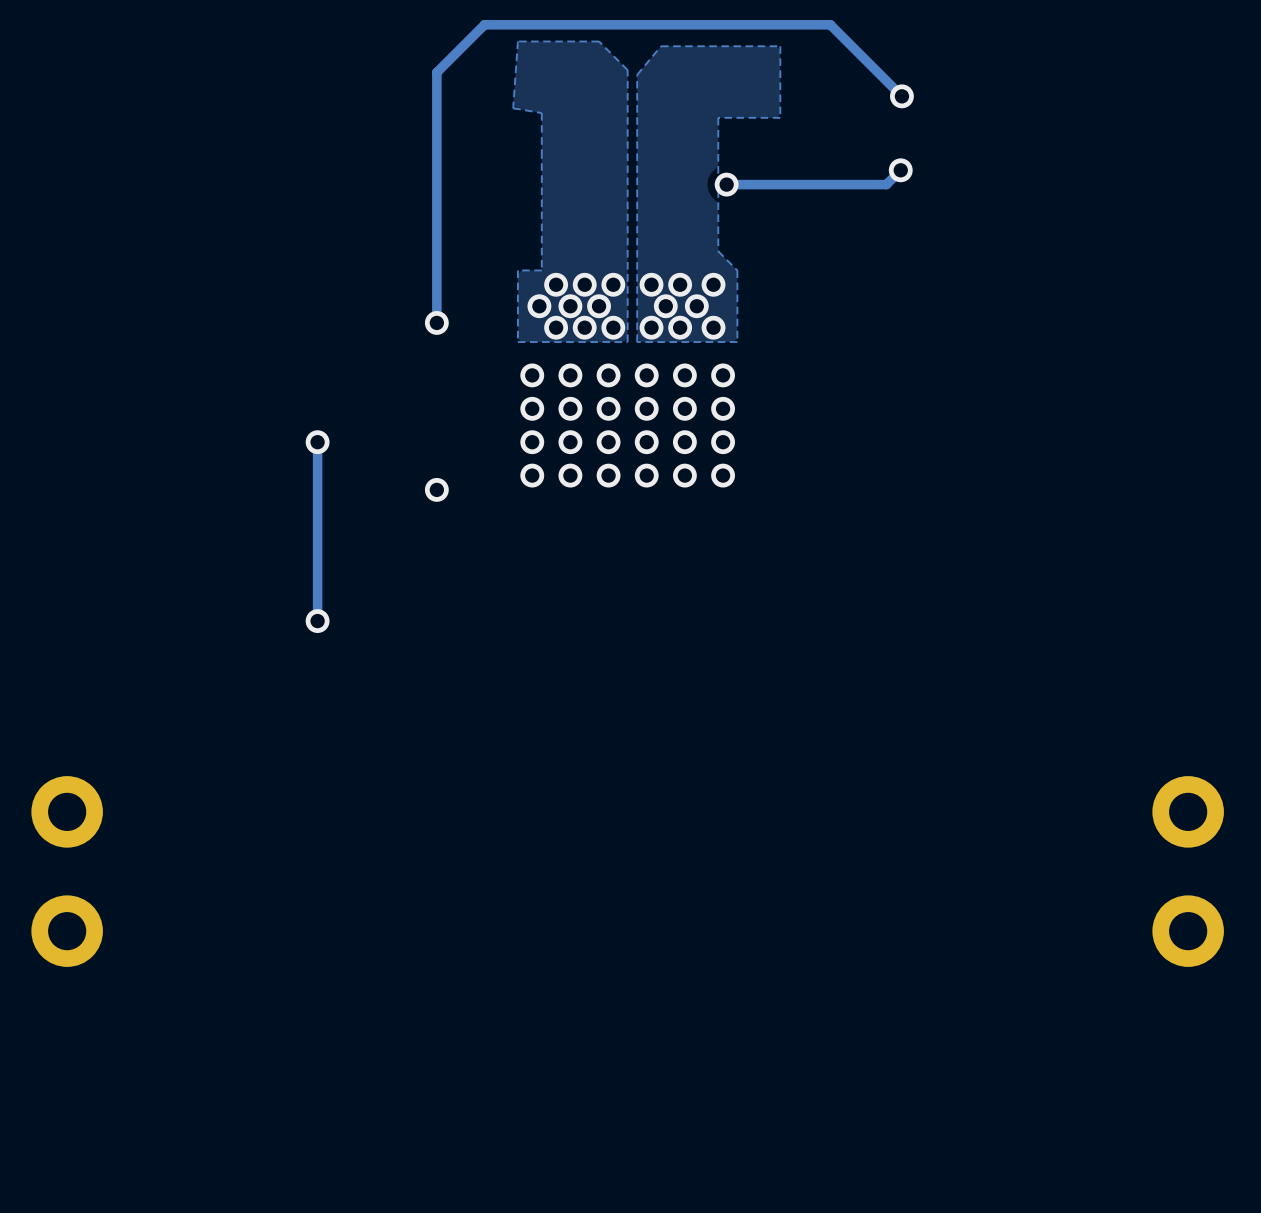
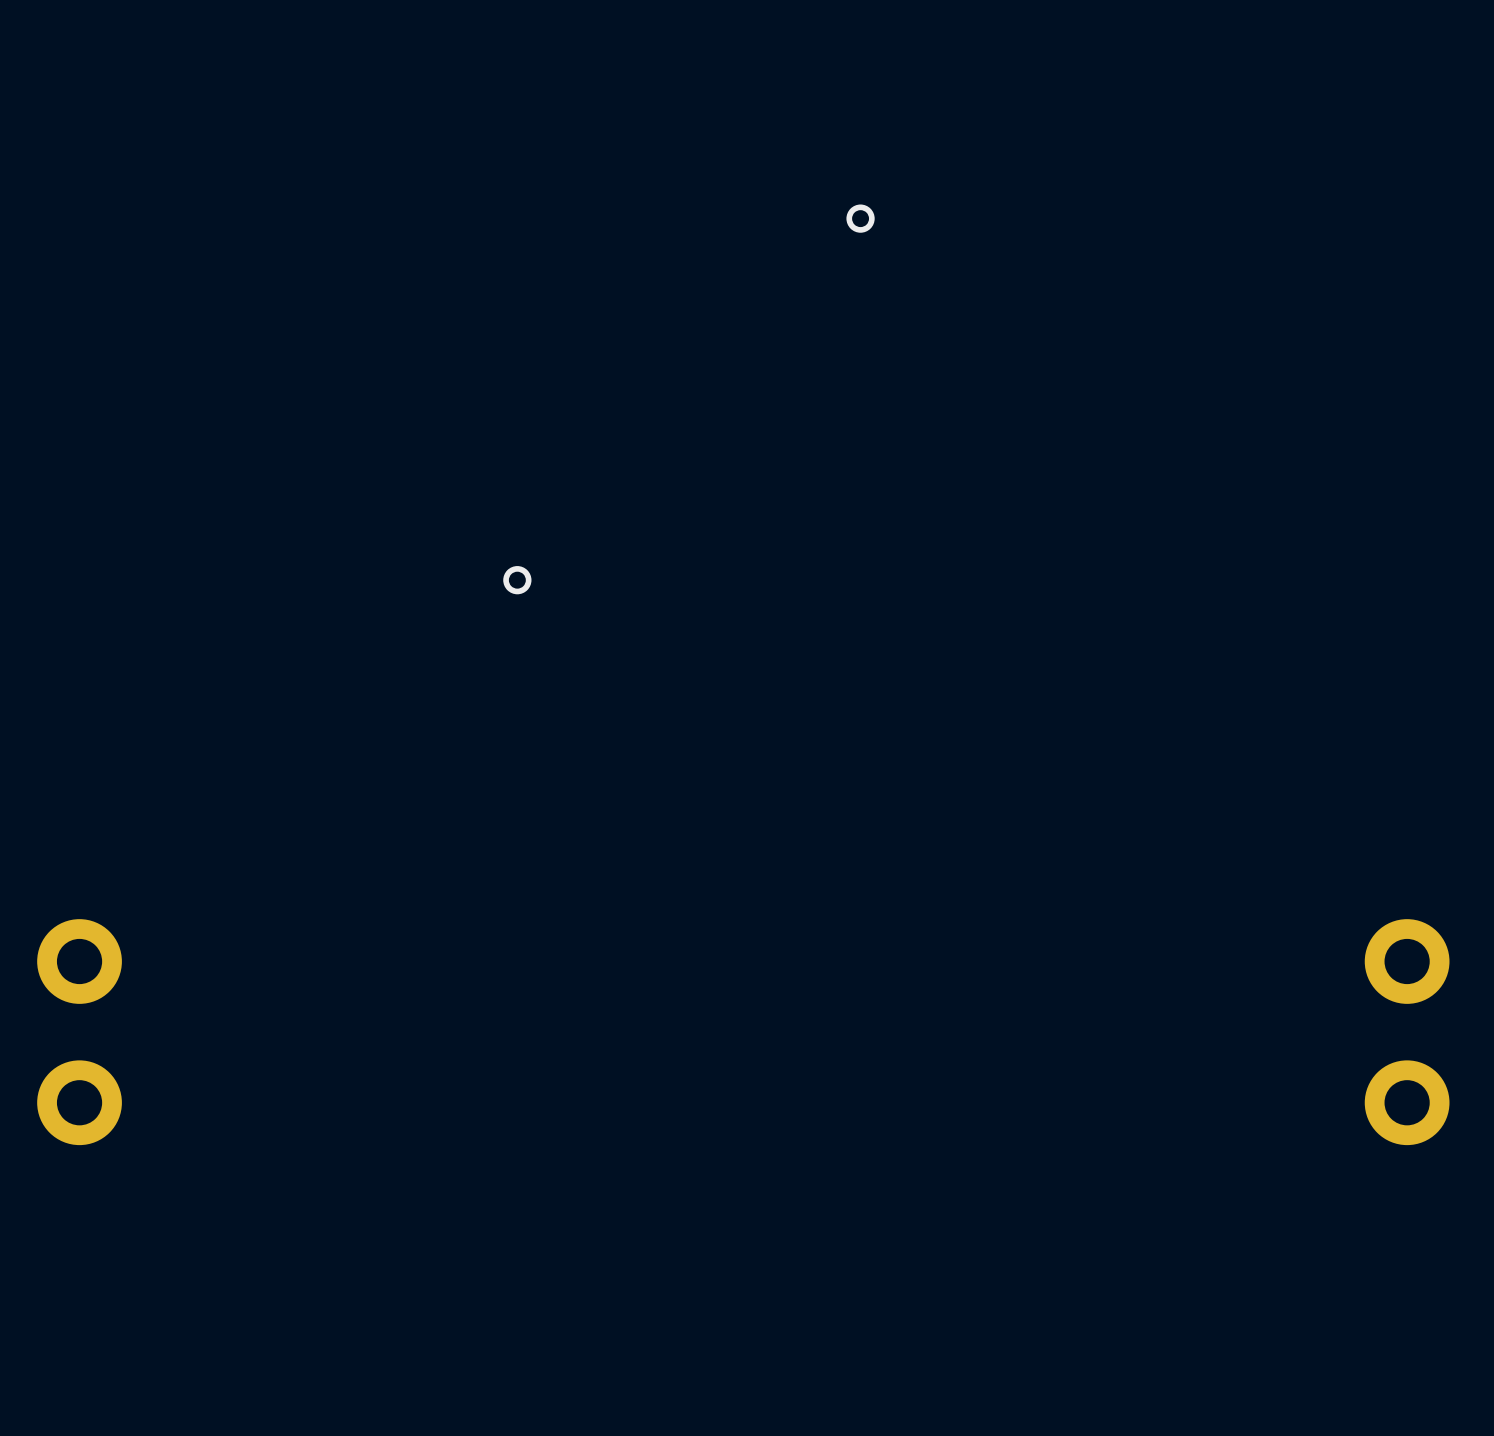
zone outline: (599, 41) (627, 70) (627, 342) (517, 342) (517, 270) (541, 270) (541, 113) (513, 108) (517, 41) (599, 41) -> none
zone outline: (780, 46) (661, 46) (637, 74) (637, 342) (737, 342) (737, 270) (718, 251) (718, 117) (780, 117) (780, 46) -> none
track: (901, 96) (830, 24) (484, 24) (436, 72) (436, 322) -> none
via: (901, 96) -> none
track: (900, 170) (886, 184) (726, 184) -> none
via: (900, 170) -> none
via: (556, 284) -> none
via: (584, 284) -> none
via: (613, 284) -> none
via: (651, 284) -> none
via: (680, 284) -> none
via: (713, 284) -> none
via: (539, 306) -> none
via: (570, 306) -> none
via: (599, 306) -> none
via: (665, 306) -> none
via: (696, 306) -> none
via: (436, 322) -> none
via: (556, 327) -> none
via: (584, 327) -> none
via: (613, 327) -> none
via: (651, 327) -> none
via: (680, 327) -> none
via: (713, 327) -> none
via: (532, 375) -> none
via: (570, 375) -> none
via: (608, 375) -> none
via: (646, 375) -> none
via: (684, 375) -> none
via: (723, 375) -> none
via: (532, 408) -> none
via: (570, 408) -> none
via: (608, 408) -> none
via: (646, 408) -> none
via: (684, 408) -> none
via: (723, 408) -> none
track: (317, 442) (317, 621) -> none
via: (317, 442) -> none
via: (532, 442) -> none
via: (570, 442) -> none
via: (608, 442) -> none
via: (646, 442) -> none
via: (684, 442) -> none
via: (723, 442) -> none
via: (532, 475) -> none
via: (570, 475) -> none
via: (608, 475) -> none
via: (646, 475) -> none
via: (684, 475) -> none
via: (723, 475) -> none
via: (317, 621) -> none

